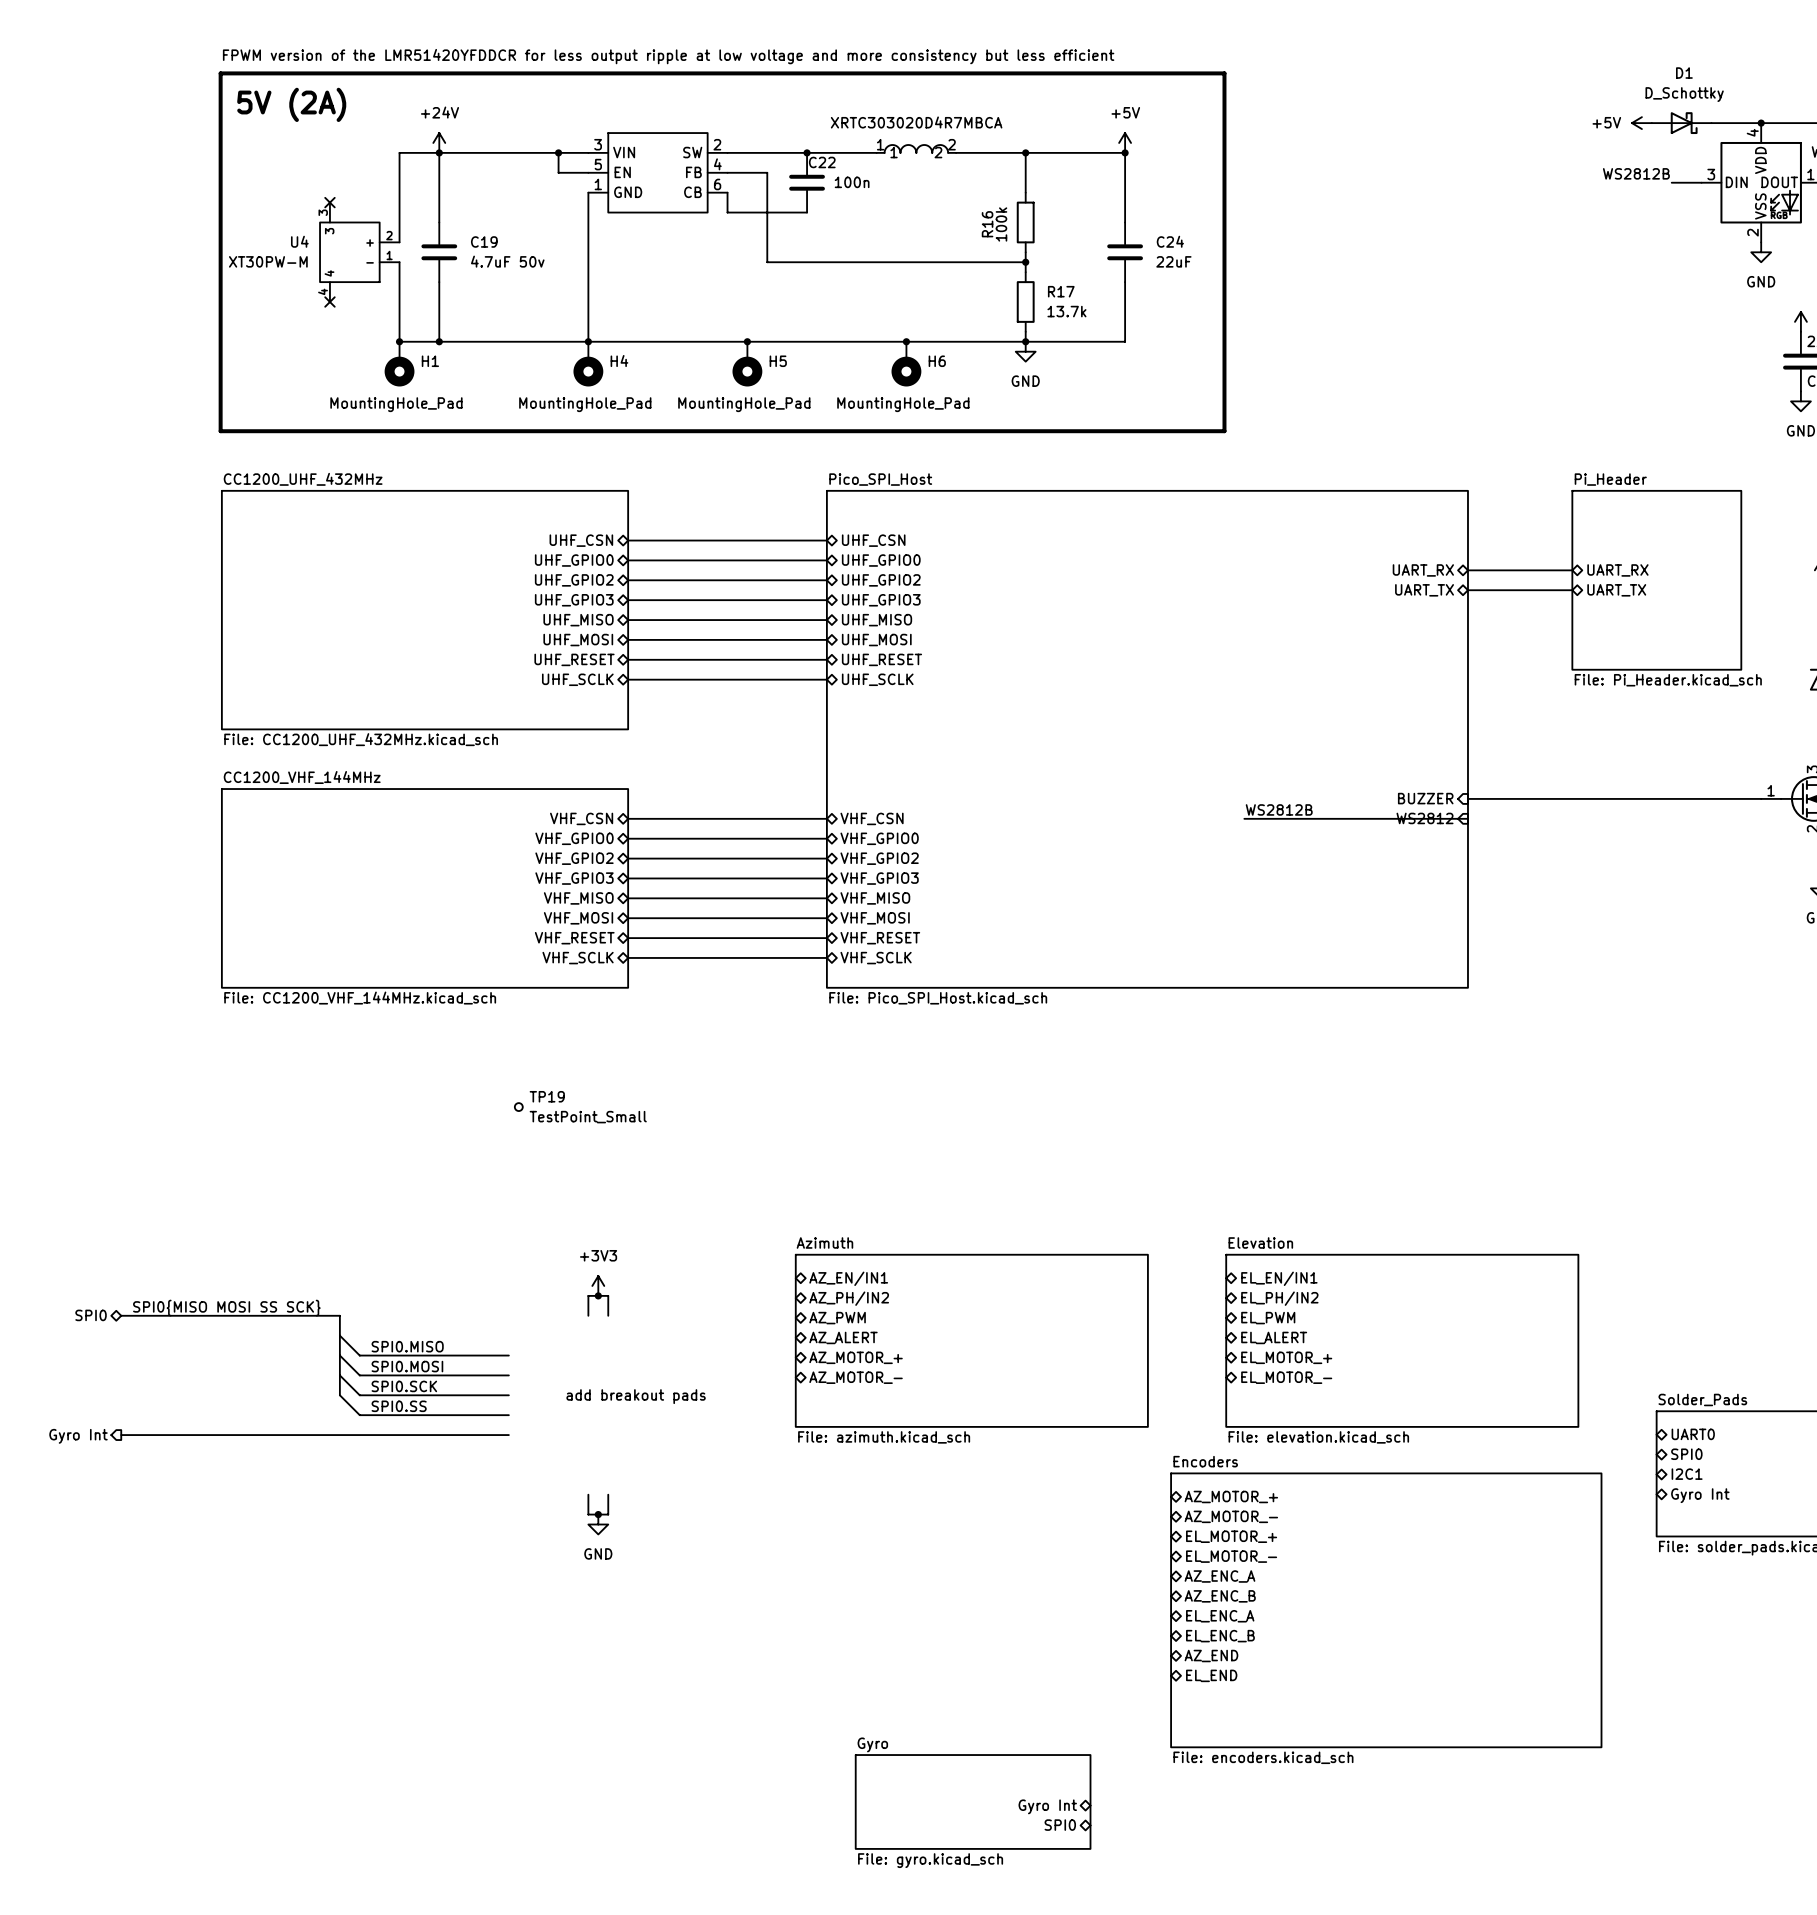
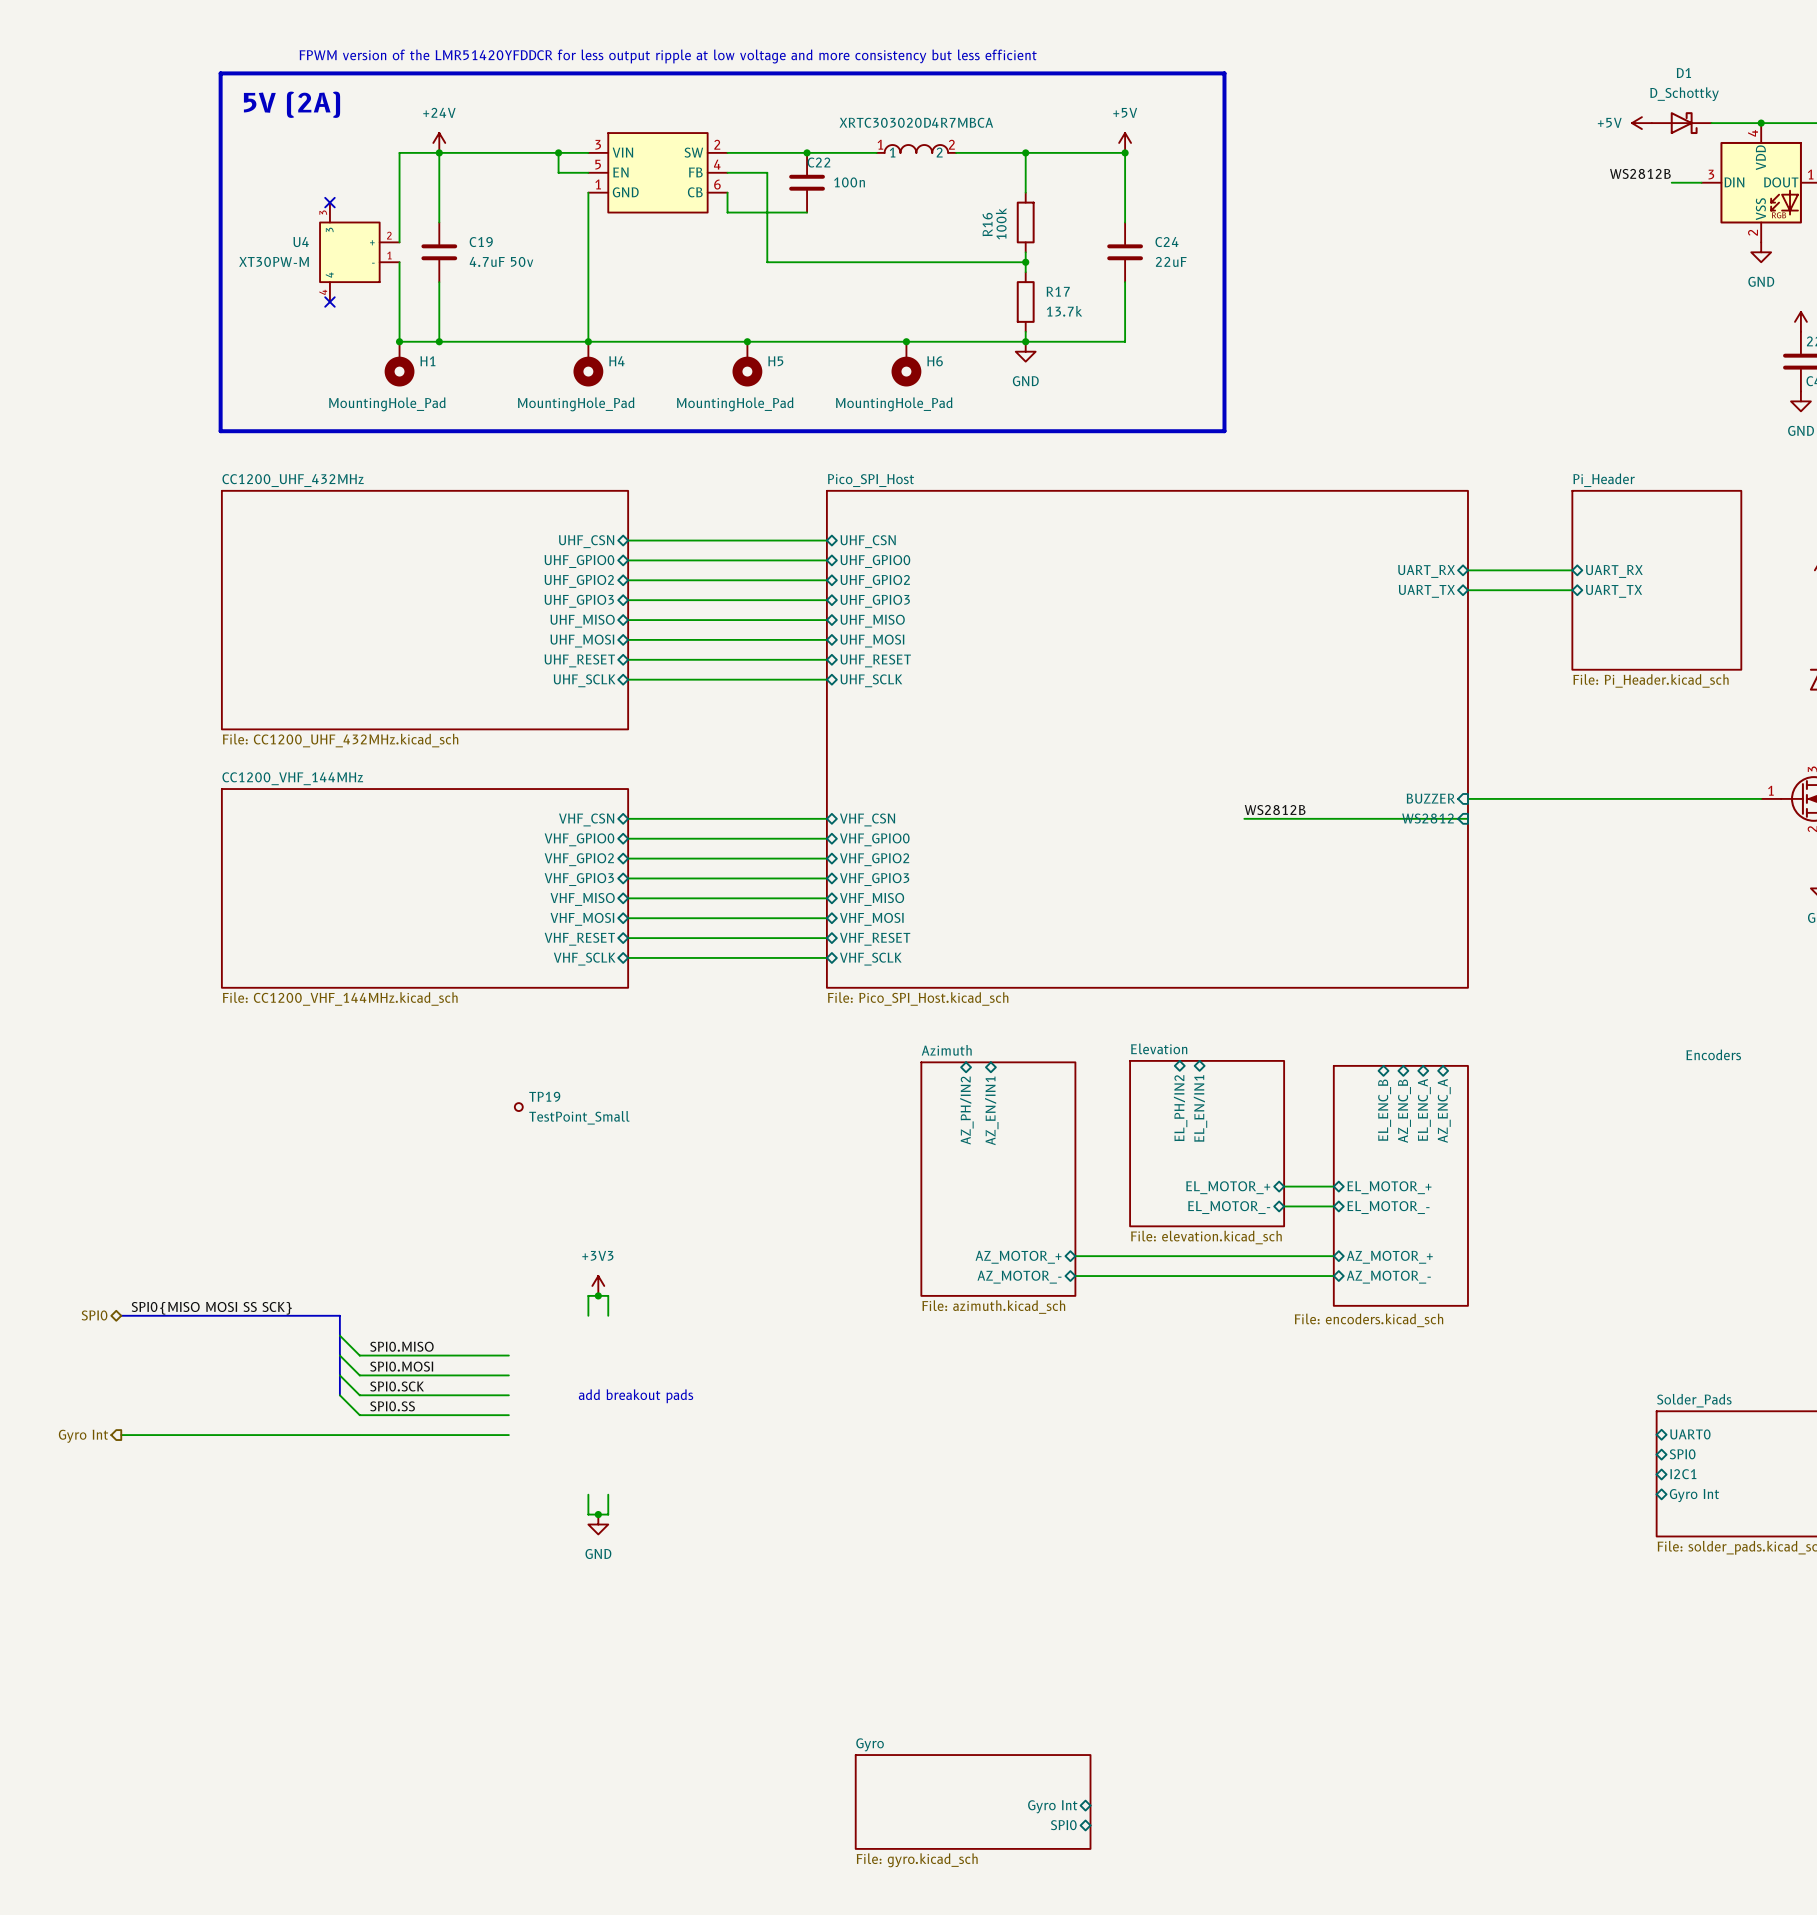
sheet pin: none -> EL_EN/IN1 (1200, 1108)
sheet pin: none -> EL_ENC_A (1424, 1109)
sheet pin: none -> EL_PH/IN2 (1180, 1108)
sheet pin: none -> EL_ENC_B (1384, 1110)
sheet pin: none -> AZ_ENC_A (1444, 1110)
sheet pin: none -> AZ_ENC_B (1404, 1111)
sheet pin: none -> AZ_PH/IN2 (966, 1110)
sheet pin: none -> AZ_EN/IN1 (991, 1110)
sheet Elevation: none -> File: elevation.kicad_sch (1207, 1143)
sheet Azimuth: none -> File: azimuth.kicad_sch (998, 1179)
sheet Encoders: none -> File: encoders.kicad_sch (1400, 1185)
sheet pin: none -> EL_MOTOR_+ (1228, 1187)
wire: none -> (1284, 1186) (1333, 1186)
sheet pin: none -> EL_MOTOR_+ (1389, 1187)
sheet pin: none -> EL_MOTOR_- (1229, 1207)
wire: none -> (1284, 1206) (1333, 1206)
sheet pin: none -> EL_MOTOR_- (1388, 1207)
sheet pin: none -> AZ_MOTOR_+ (1018, 1257)
wire: none -> (1075, 1256) (1333, 1256)
sheet pin: none -> AZ_MOTOR_+ (1389, 1257)
sheet pin: none -> AZ_MOTOR_- (1019, 1277)
wire: none -> (1075, 1276) (1333, 1276)
sheet pin: none -> AZ_MOTOR_- (1388, 1277)
sheet pin: AZ_EN/IN1 (848, 1278) -> none
sheet pin: EL_EN/IN1 (1279, 1278) -> none
sheet pin: AZ_PH/IN2 (849, 1298) -> none
sheet pin: EL_PH/IN2 (1279, 1298) -> none
sheet pin: AZ_PWM (837, 1318) -> none
sheet pin: EL_PWM (1268, 1318) -> none
sheet pin: AZ_ALERT (843, 1337) -> none
sheet pin: EL_ALERT (1274, 1337) -> none
sheet Azimuth: File: azimuth.kicad_sch (971, 1340) -> none
sheet Elevation: File: elevation.kicad_sch (1402, 1340) -> none
sheet pin: AZ_MOTOR_+ (856, 1357) -> none
sheet pin: EL_MOTOR_+ (1286, 1357) -> none
sheet pin: AZ_MOTOR_- (856, 1377) -> none
sheet pin: EL_MOTOR_- (1286, 1377) -> none
sheet pin: AZ_MOTOR_+ (1231, 1496) -> none
sheet pin: AZ_MOTOR_- (1231, 1516) -> none
sheet pin: EL_MOTOR_+ (1231, 1536) -> none
sheet pin: EL_MOTOR_- (1231, 1556) -> none
sheet pin: AZ_ENC_A (1219, 1576) -> none
sheet pin: AZ_ENC_B (1220, 1596) -> none
sheet Encoders: File: encoders.kicad_sch (1386, 1610) -> none
sheet pin: EL_ENC_A (1220, 1616) -> none
sheet pin: EL_ENC_B (1220, 1636) -> none
sheet pin: AZ_END (1211, 1656) -> none
sheet pin: EL_END (1211, 1675) -> none

